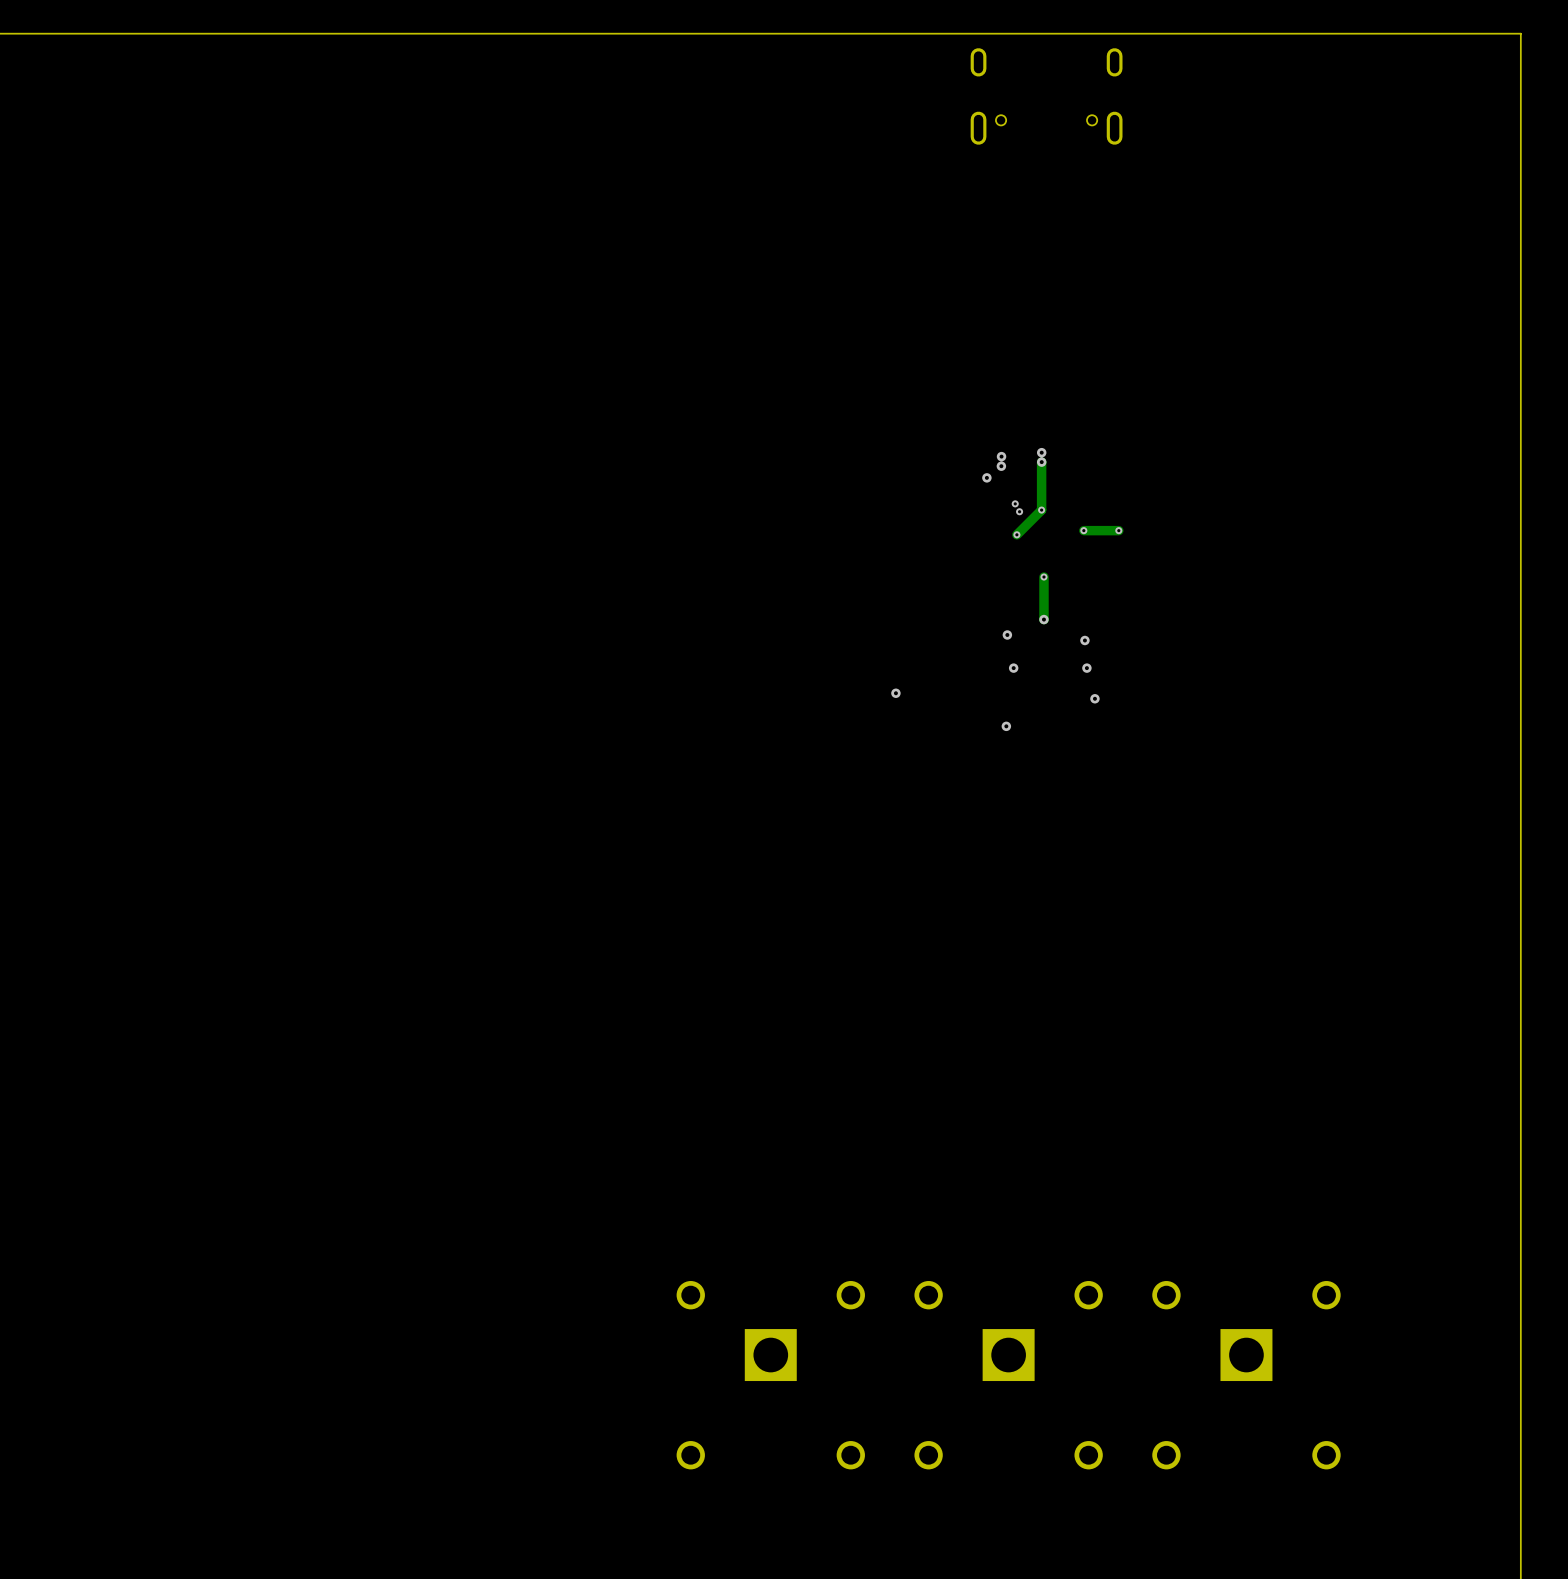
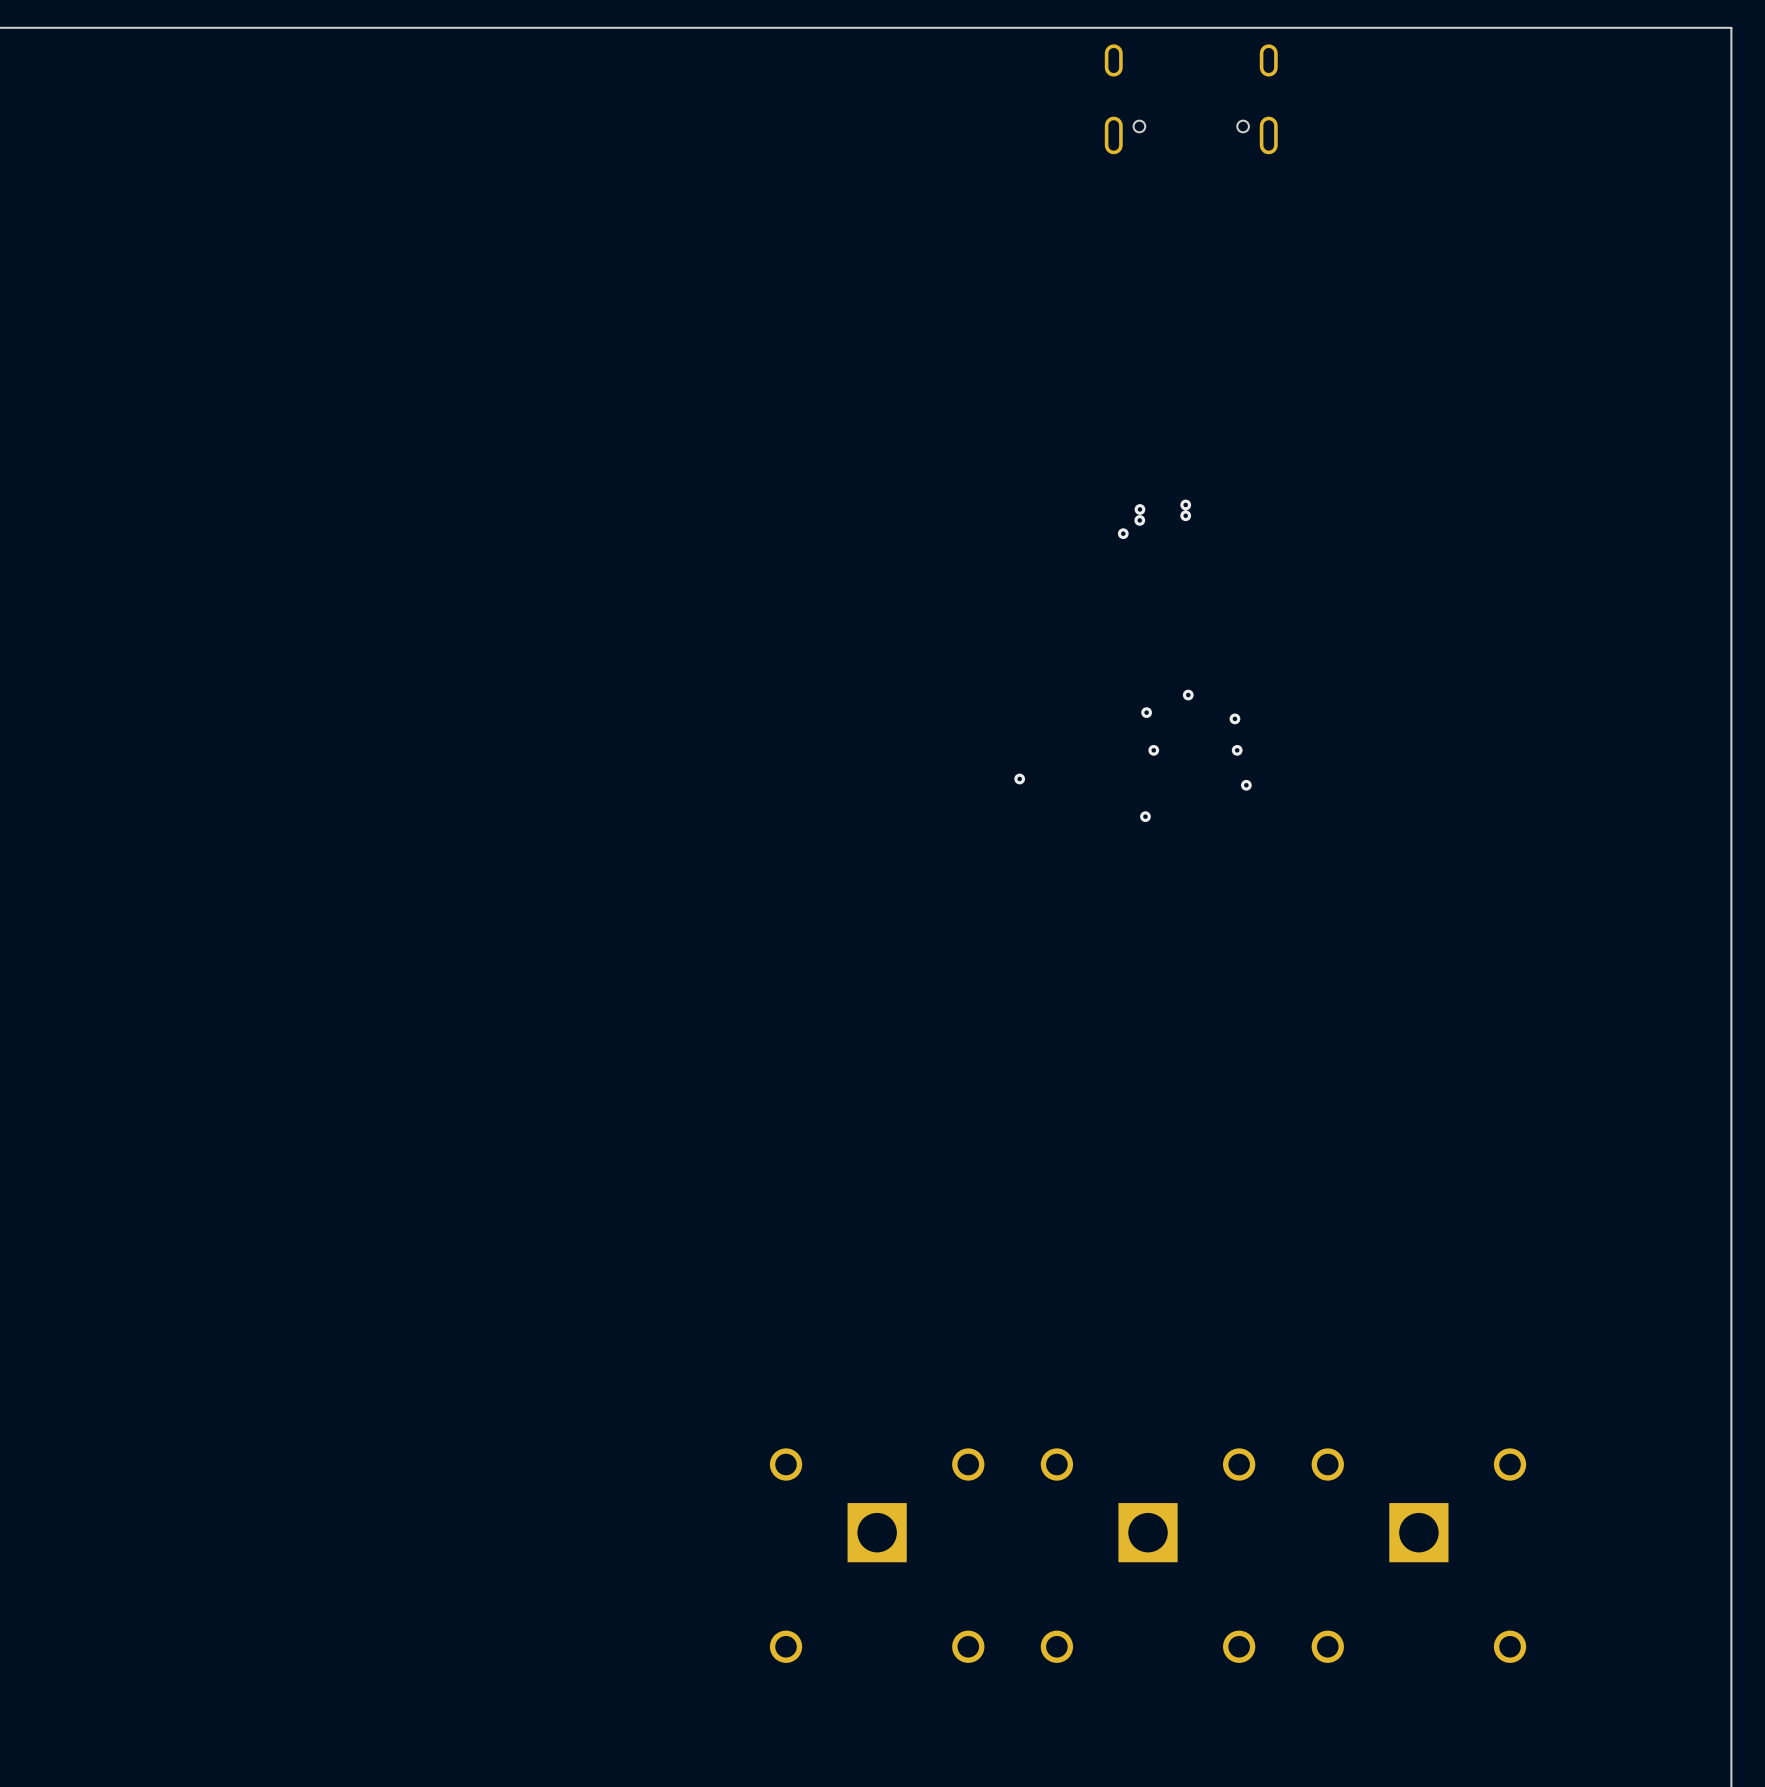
track: (1041, 462) (1041, 510) (1016, 534) -> none
via: (1015, 503) -> none
via: (1041, 510) -> none
via: (1019, 511) -> none
via: (1083, 530) -> none
track: (1118, 530) (1083, 530) -> none
via: (1118, 530) -> none
via: (1016, 534) -> none
track: (1043, 577) (1043, 619) -> none
via: (1043, 577) -> none

